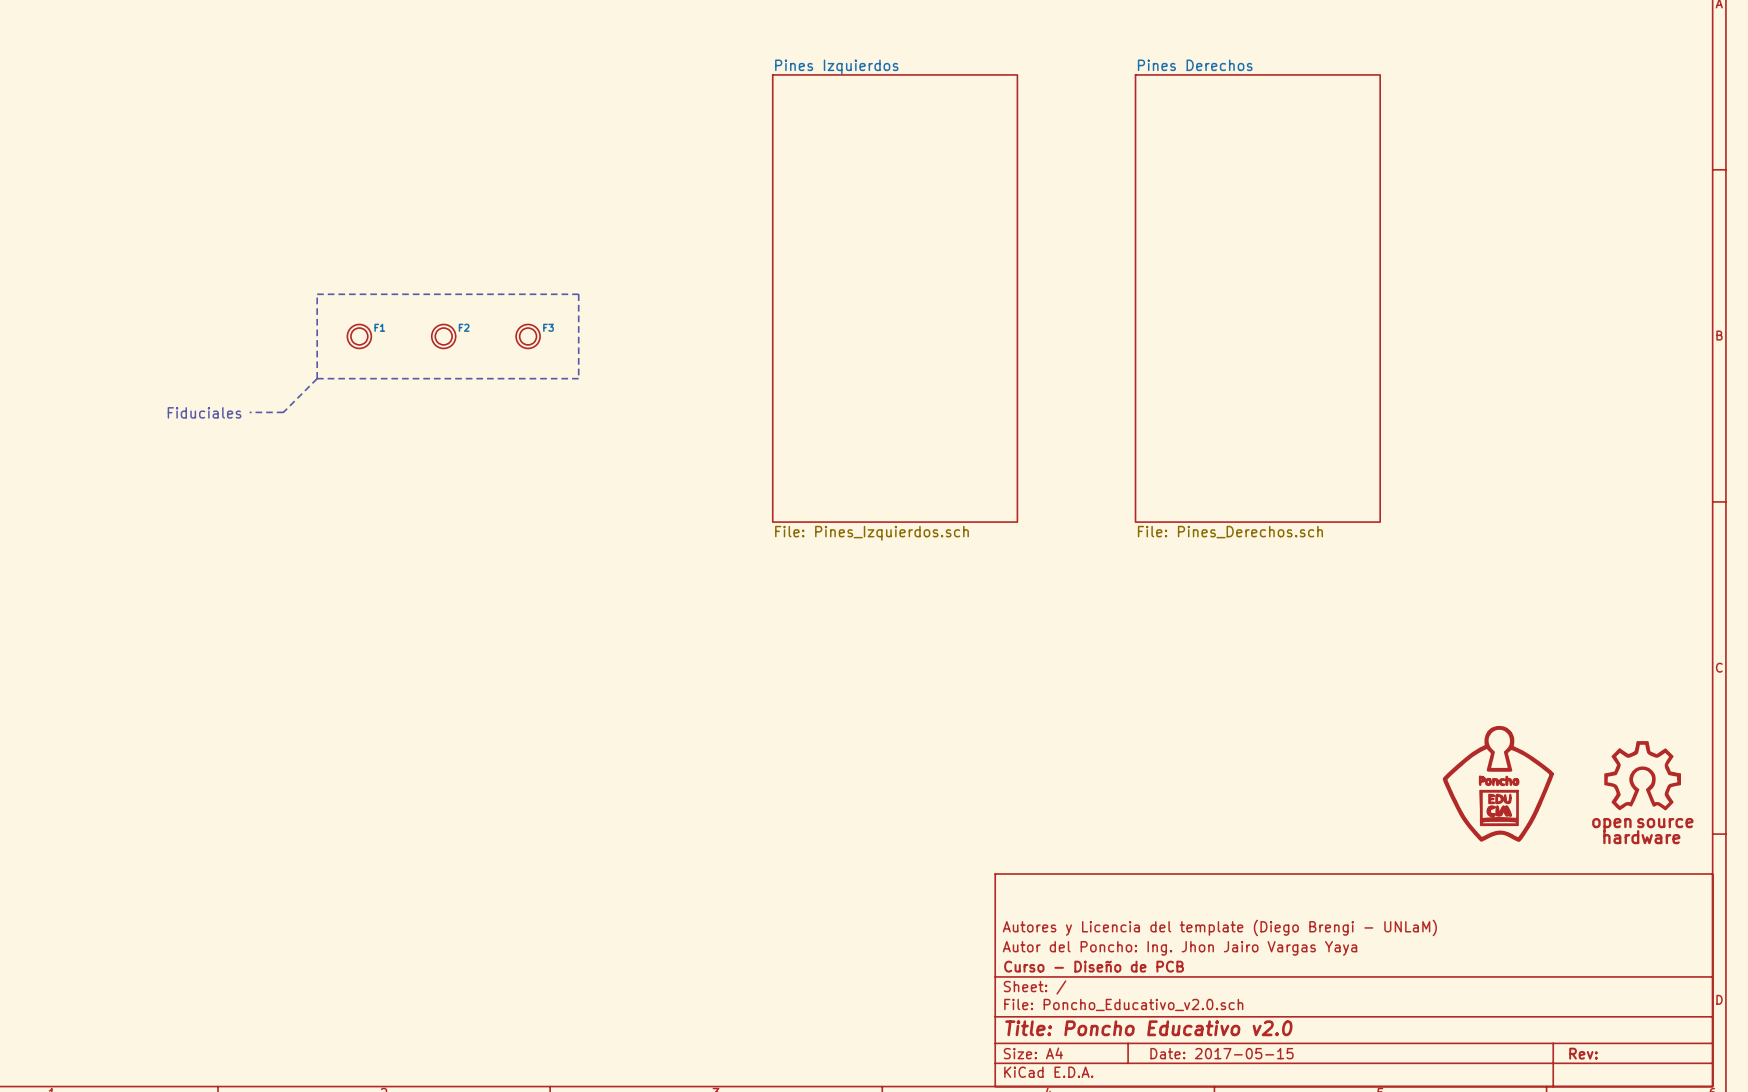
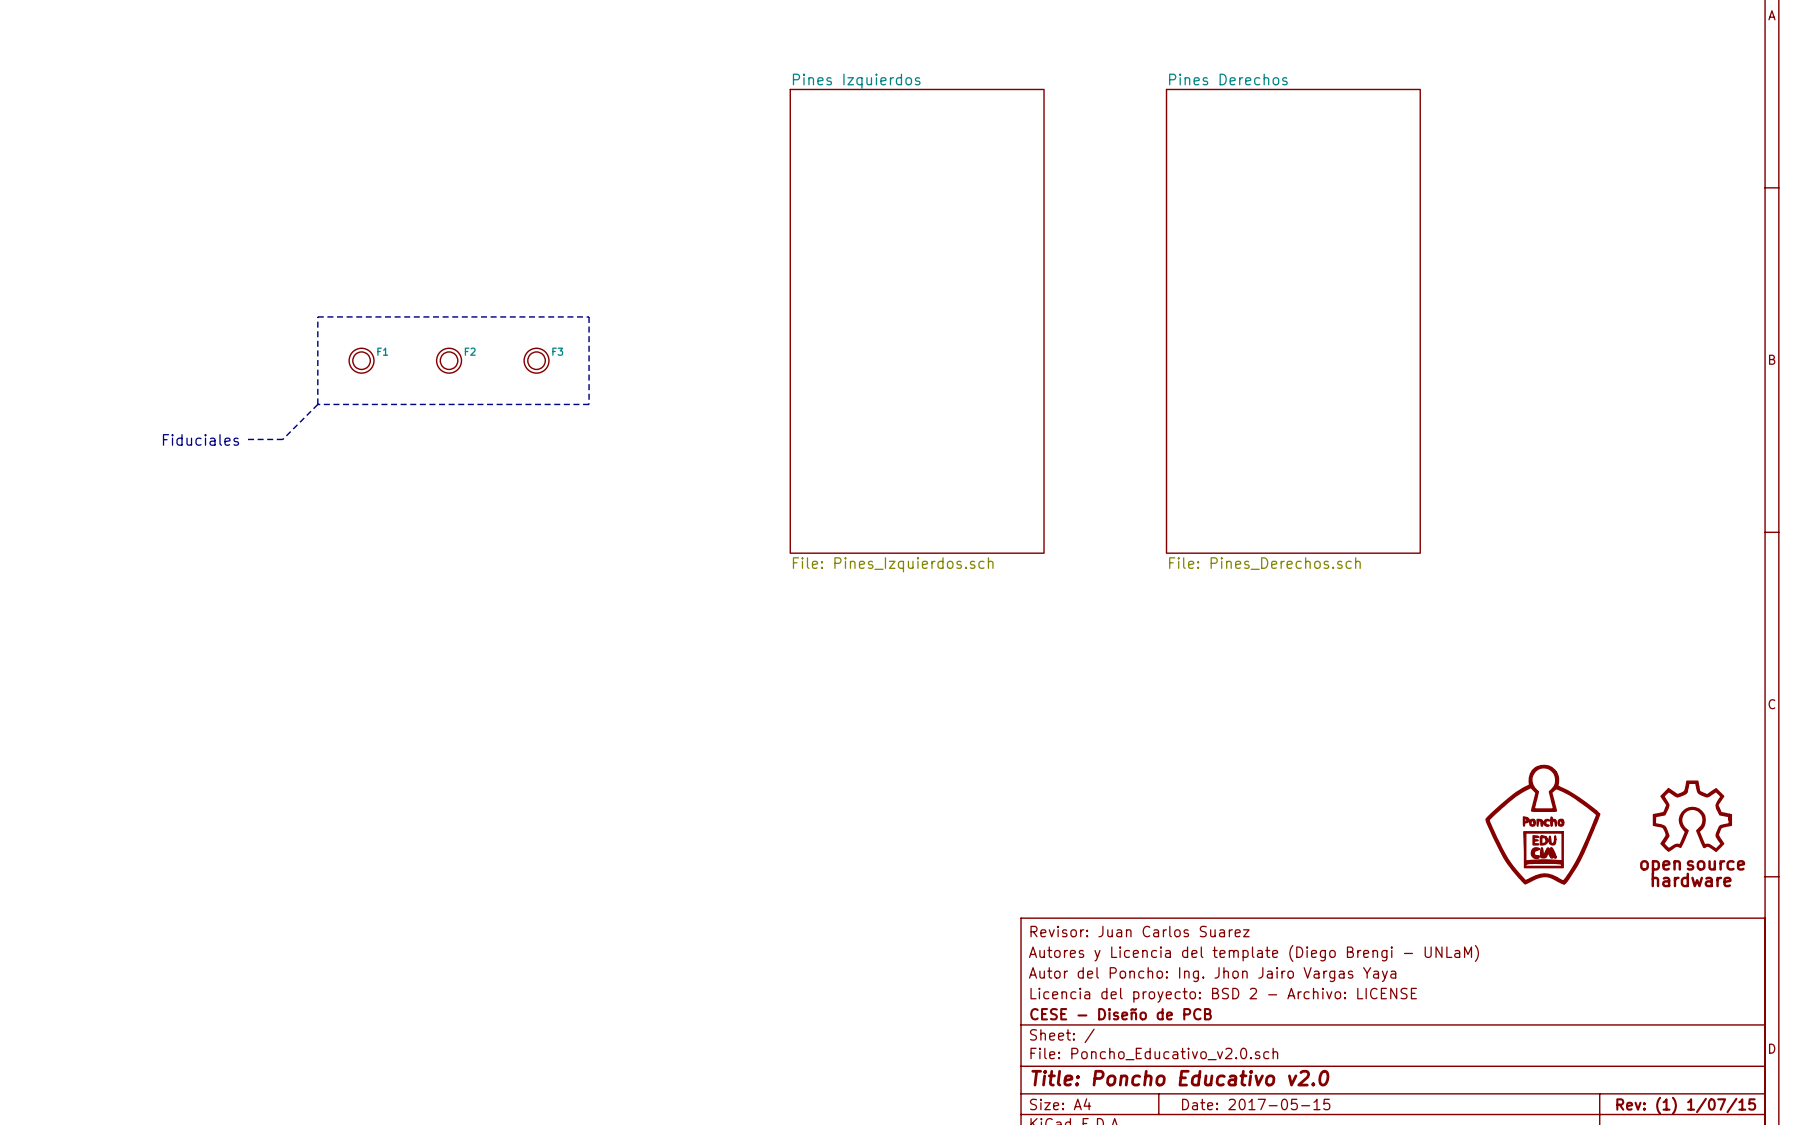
title block: none -> Revisor: Juan Carlos Suarez (1140, 931)
title block: none -> Autores y Licencia del template (Diego Brengi - UNLaM) (1253, 953)
title block: Autores y Licencia del template (Diego Brengi - UNLaM) (1219, 927) -> Autor del Poncho: Ing. Jhon Jairo Vargas Yaya (1212, 974)
title block: Autor del Poncho: Ing. Jhon Jairo Vargas Yaya (1179, 948) -> Licencia del proyecto: BSD 2 - Archivo: LICENSE (1223, 995)
title block: Curso - Diseño de PCB (1094, 966) -> CESE - Diseño de PCB (1121, 1014)
title block: Rev: (1583, 1053) -> Rev: (1) 1/07/15 (1686, 1105)

